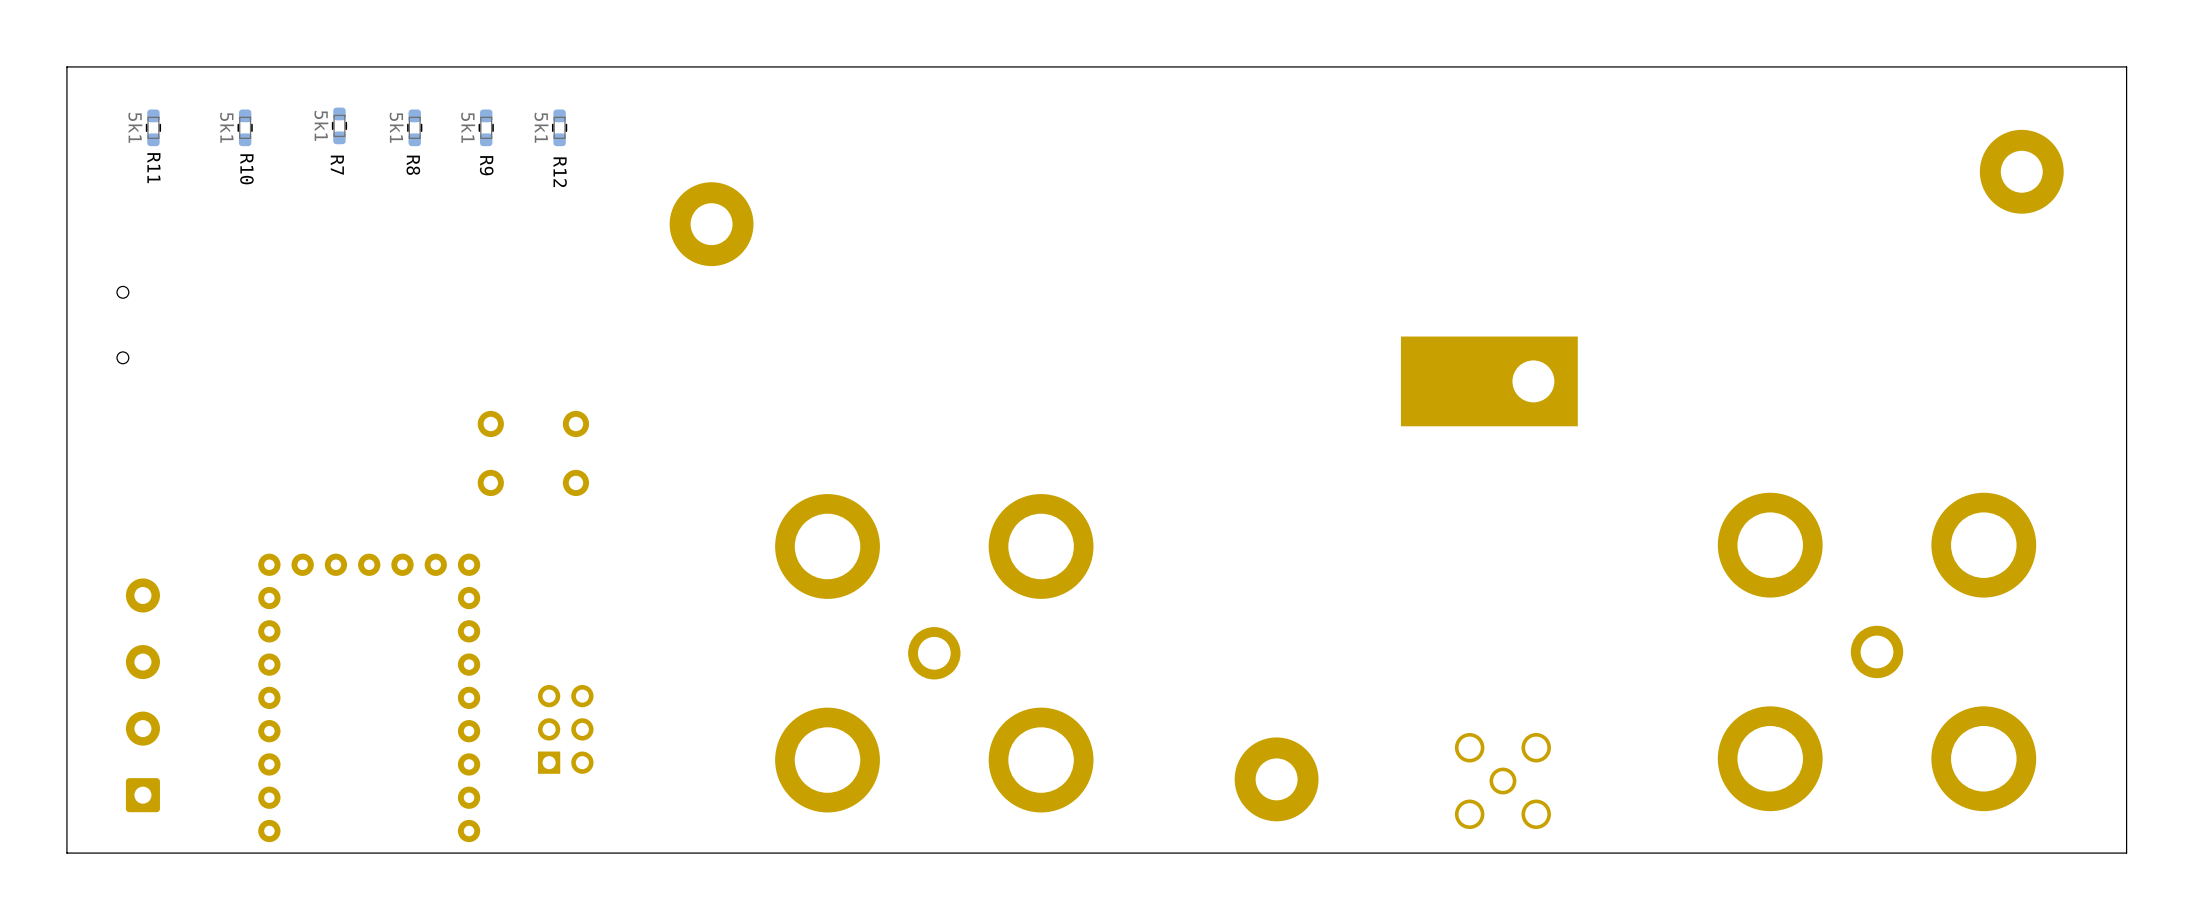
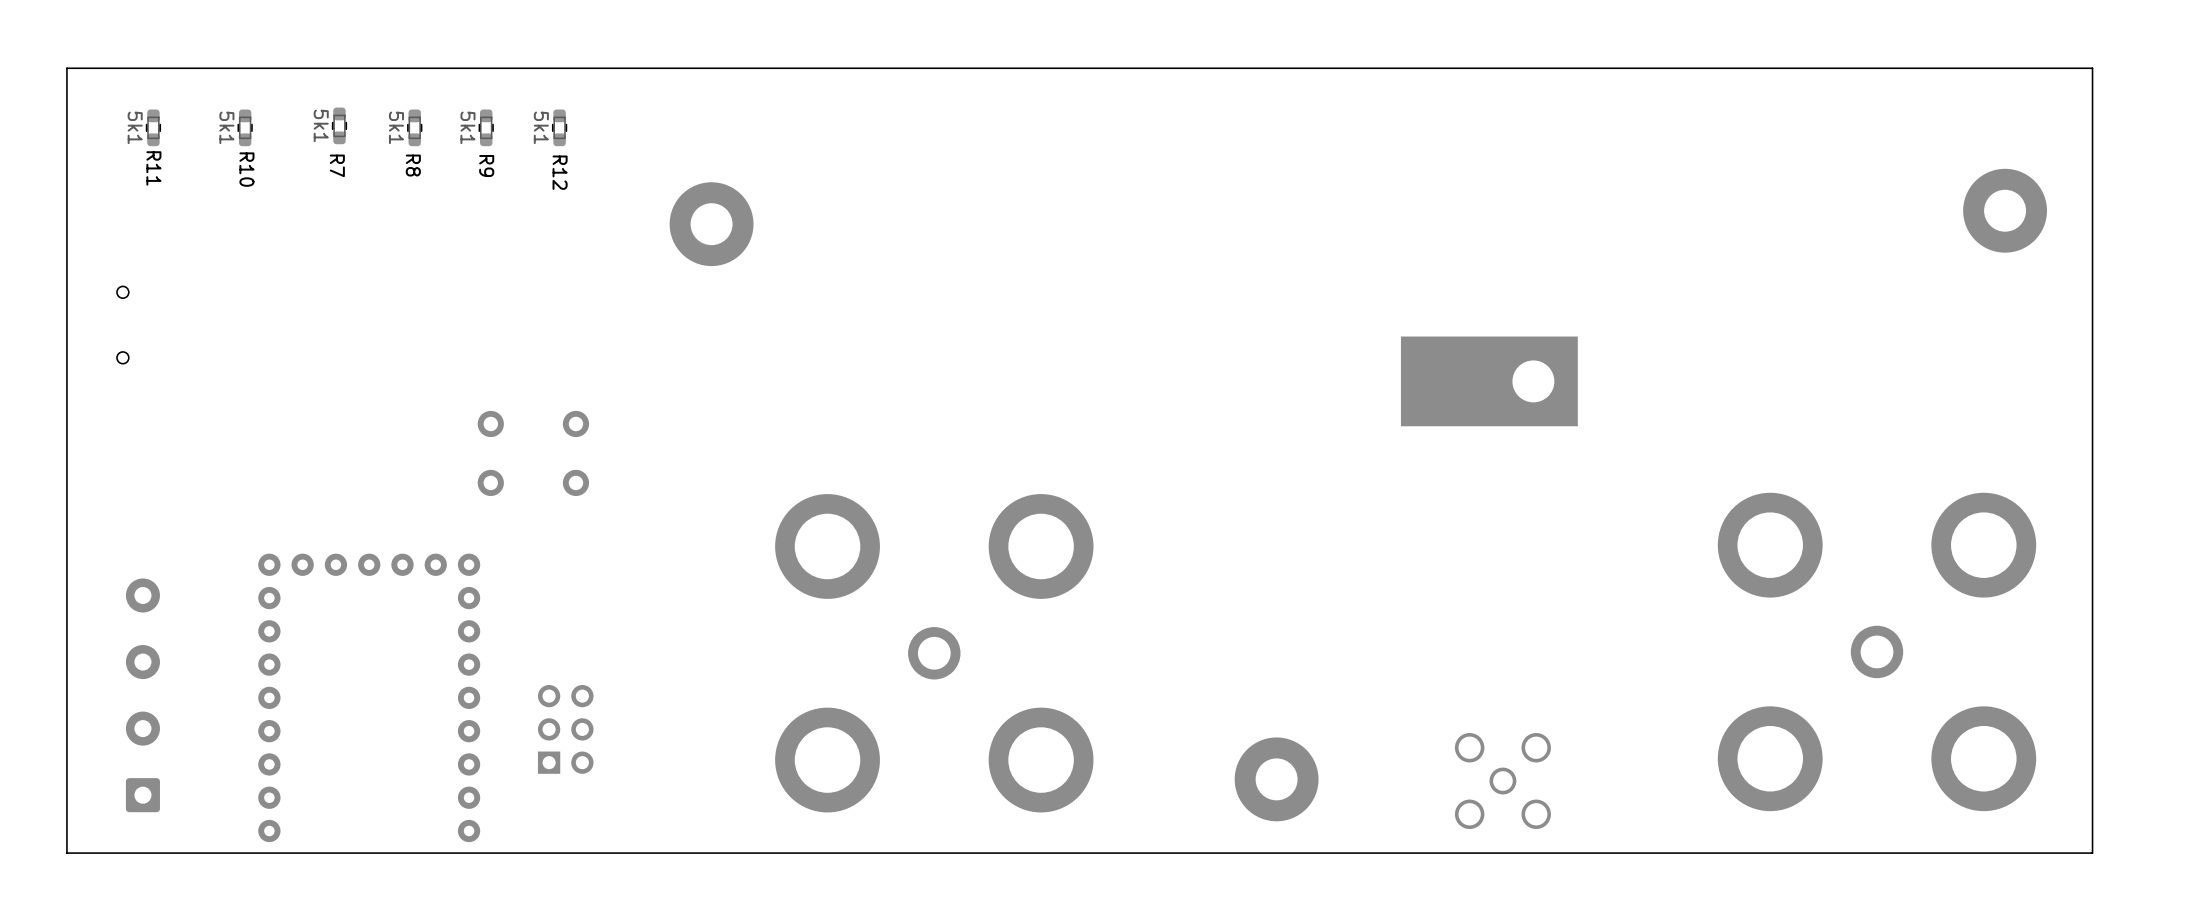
board edge: (66, 68) (2126, 66) (2126, 853) (2092, 853) -> (66, 68) (2092, 68) (2092, 853)
part position: (2021, 171) -> (2005, 210)

